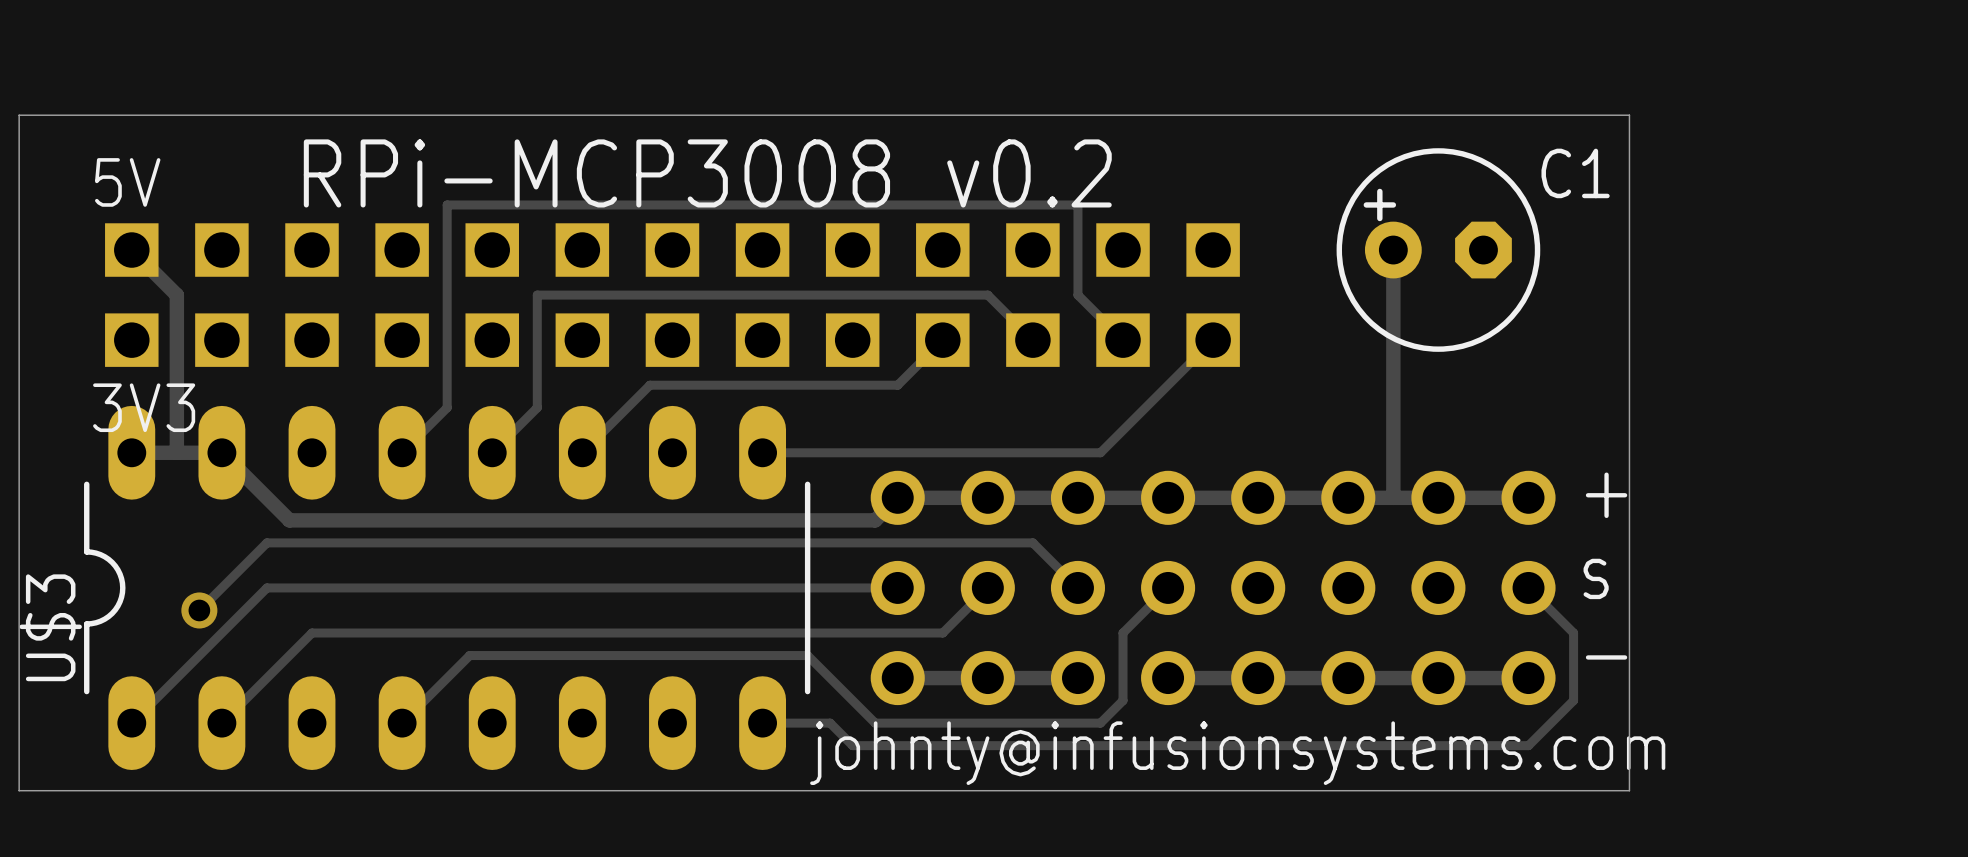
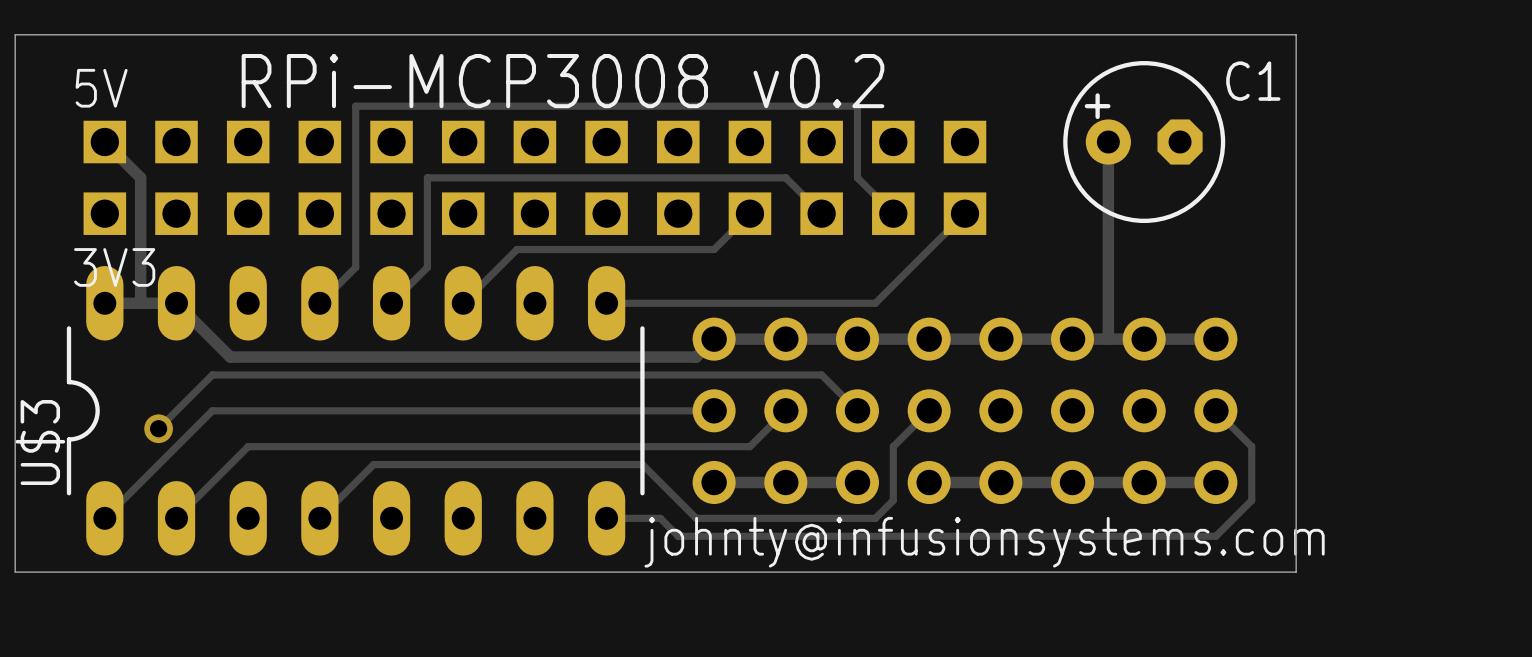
text: + (1606, 495) -> none
text: s (1596, 578) -> none
text: - (1606, 657) -> none

